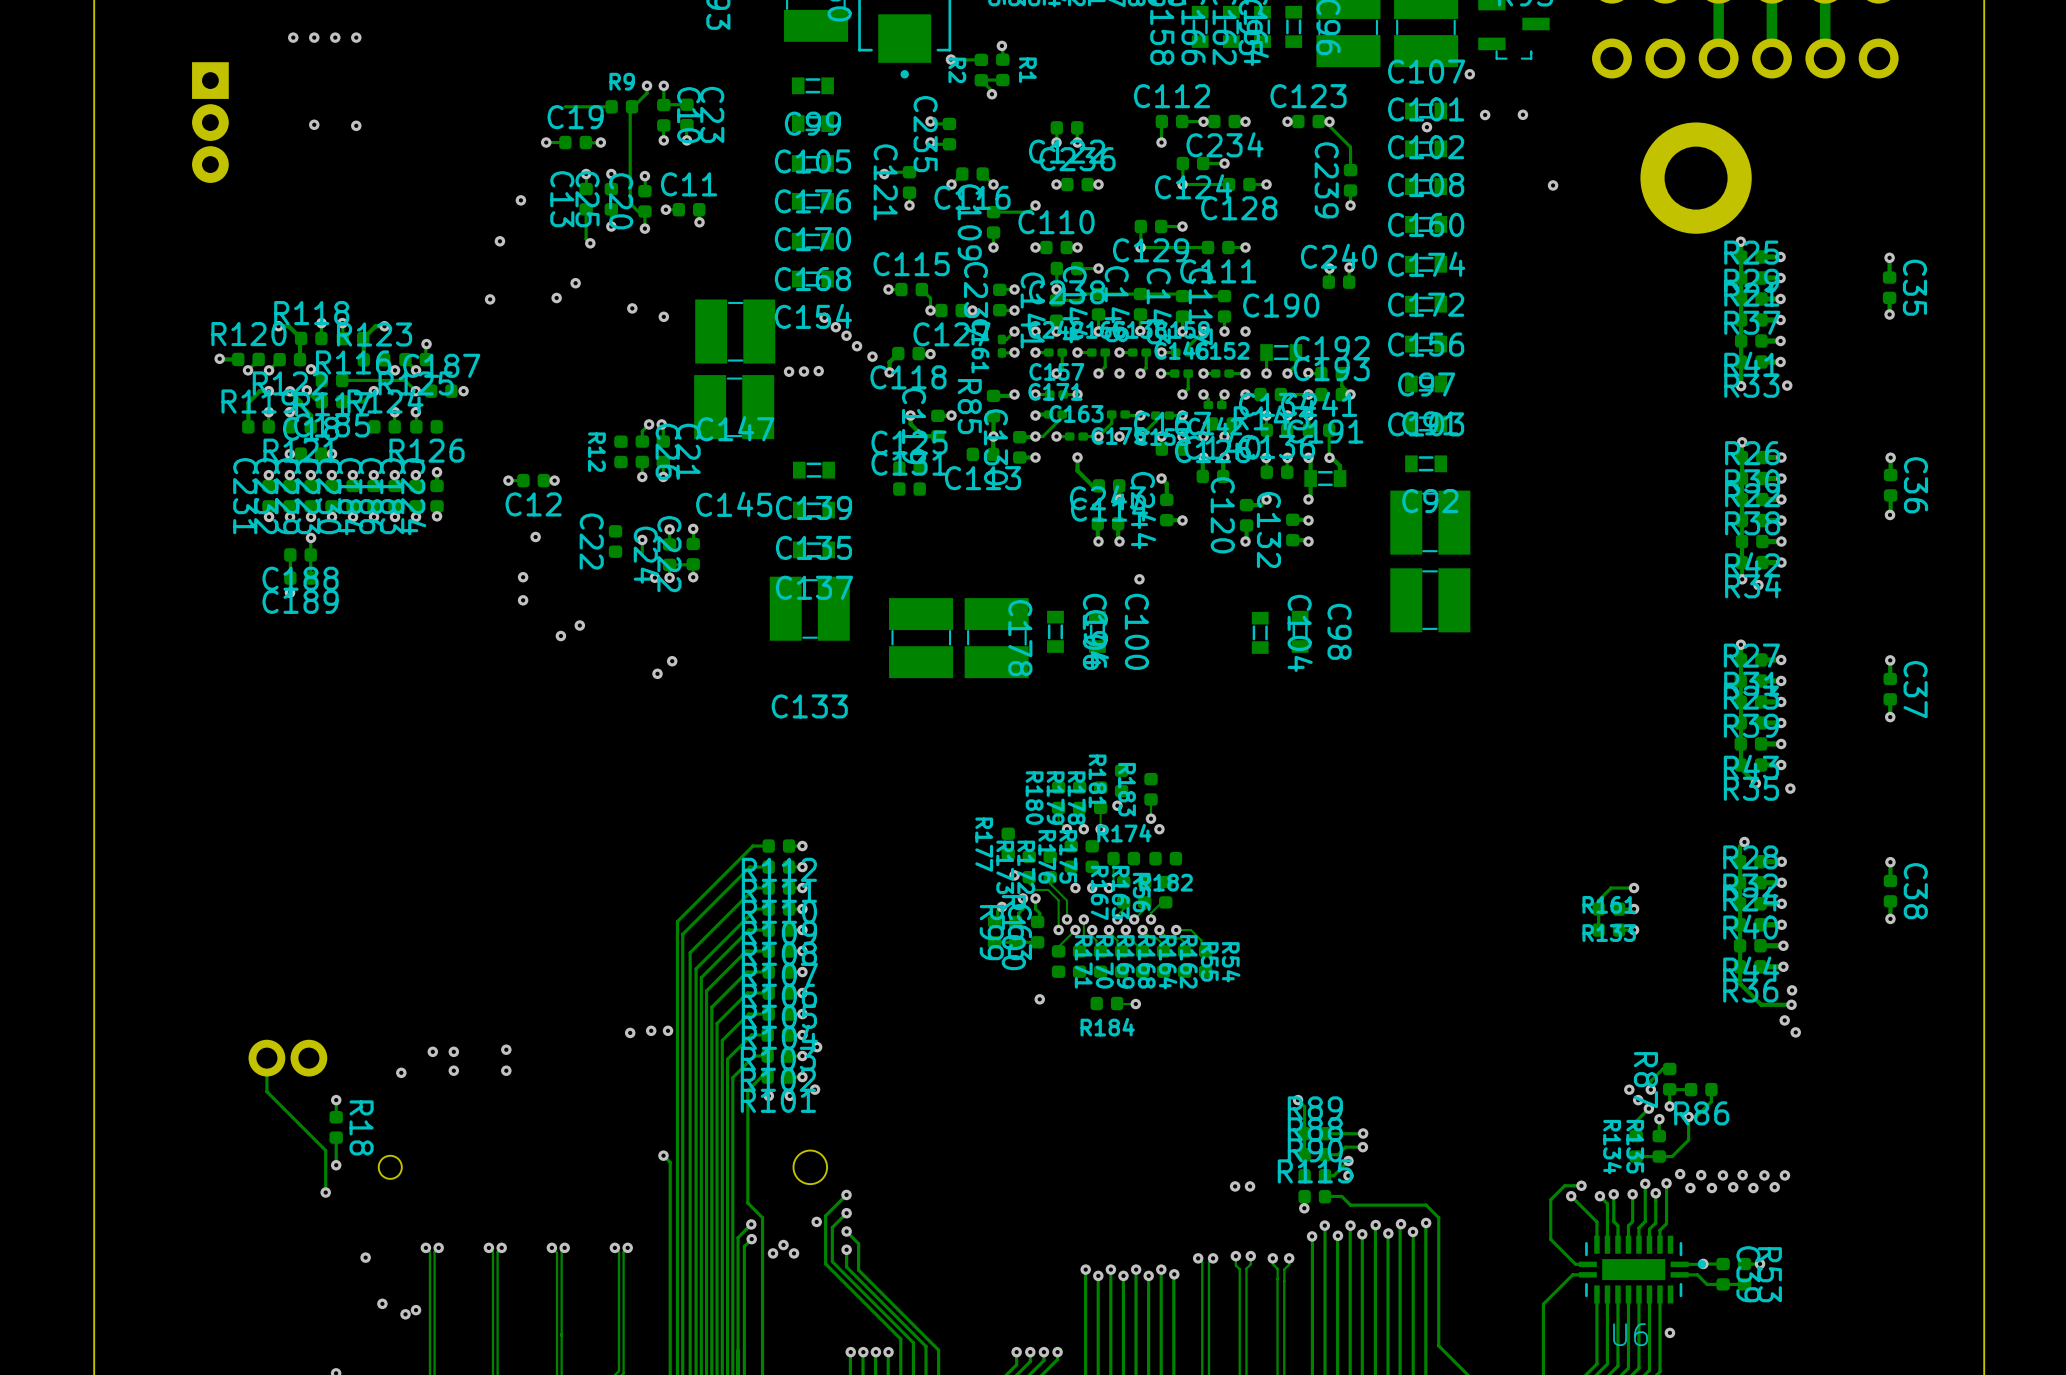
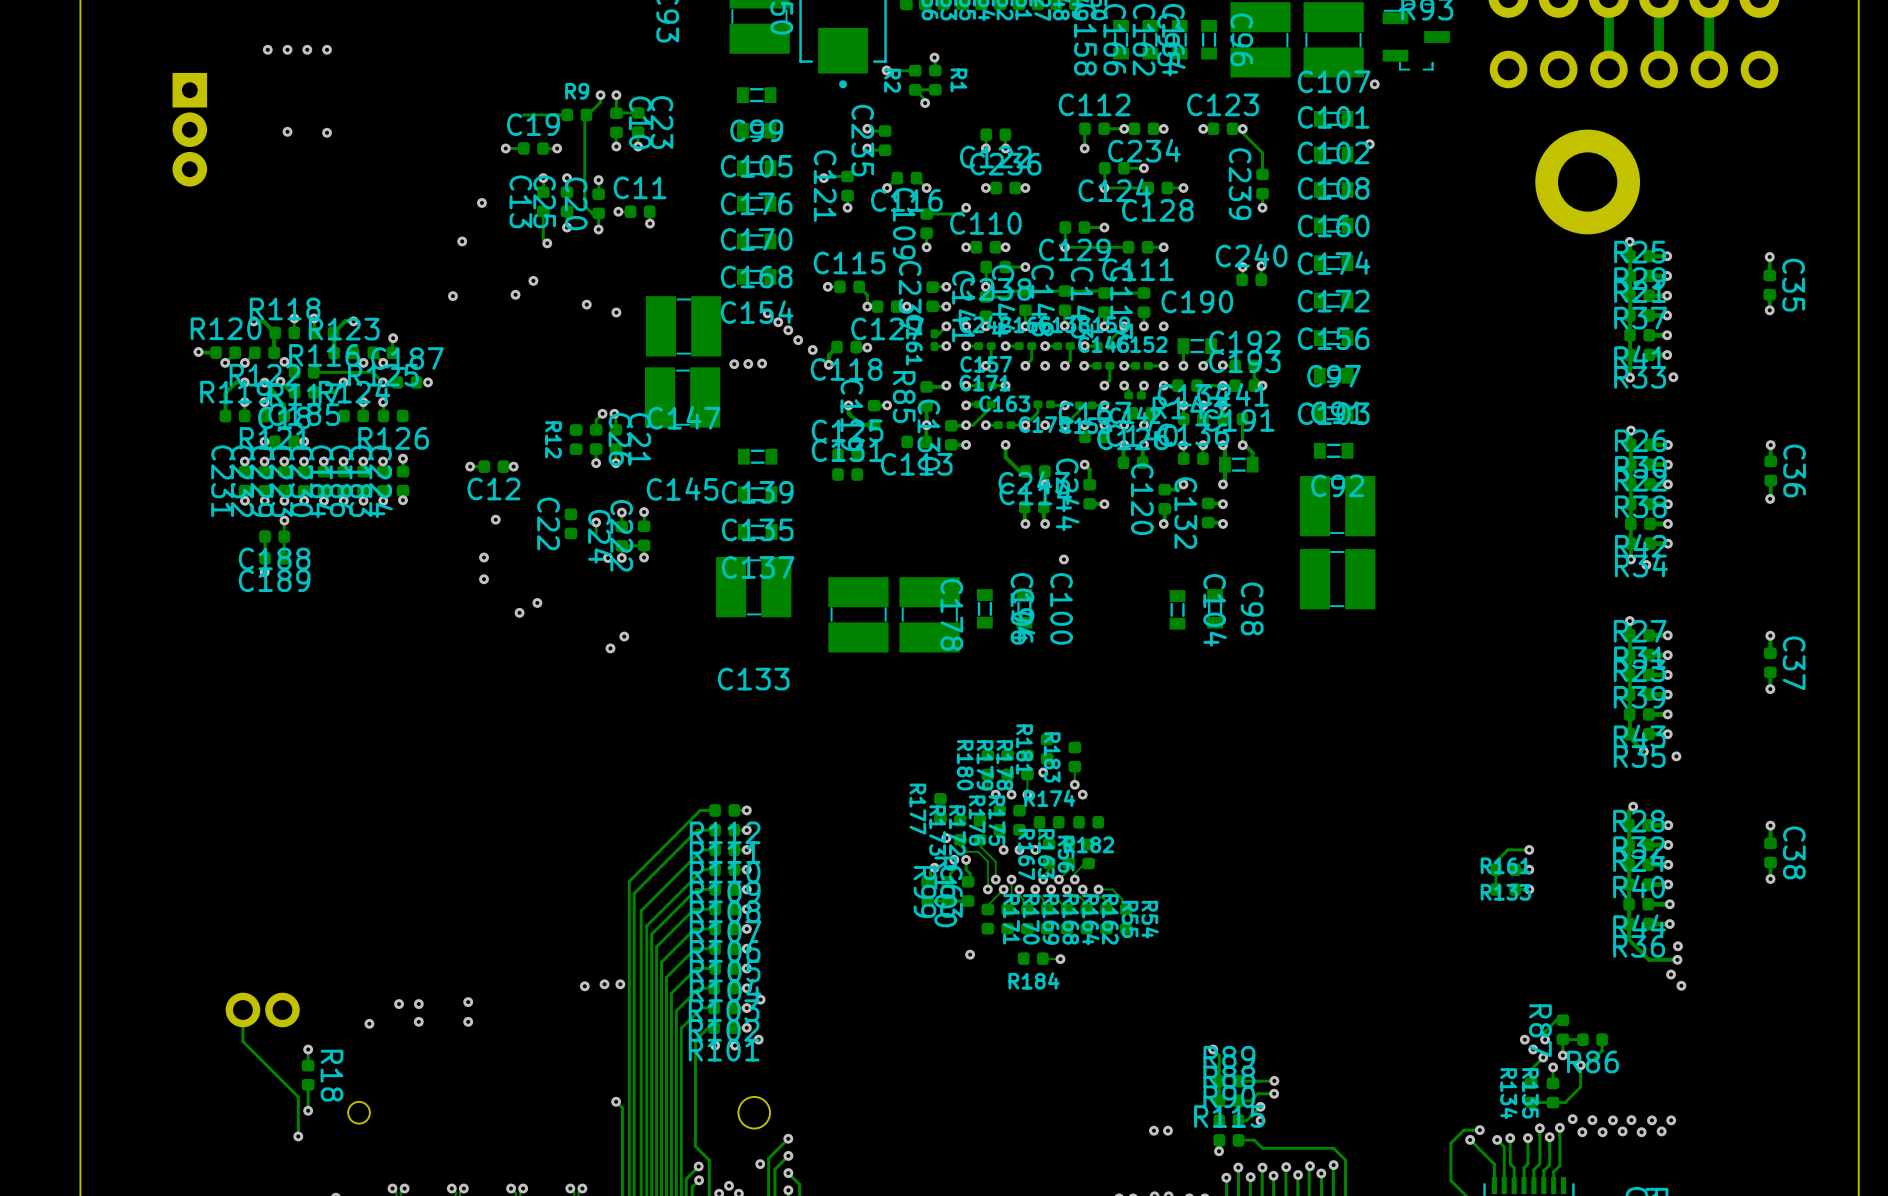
via: (1522, 114) -> none
via: (1485, 115) -> none
via: (1426, 127) -> none
via: none -> (1369, 144)
via: (1553, 185) -> none

